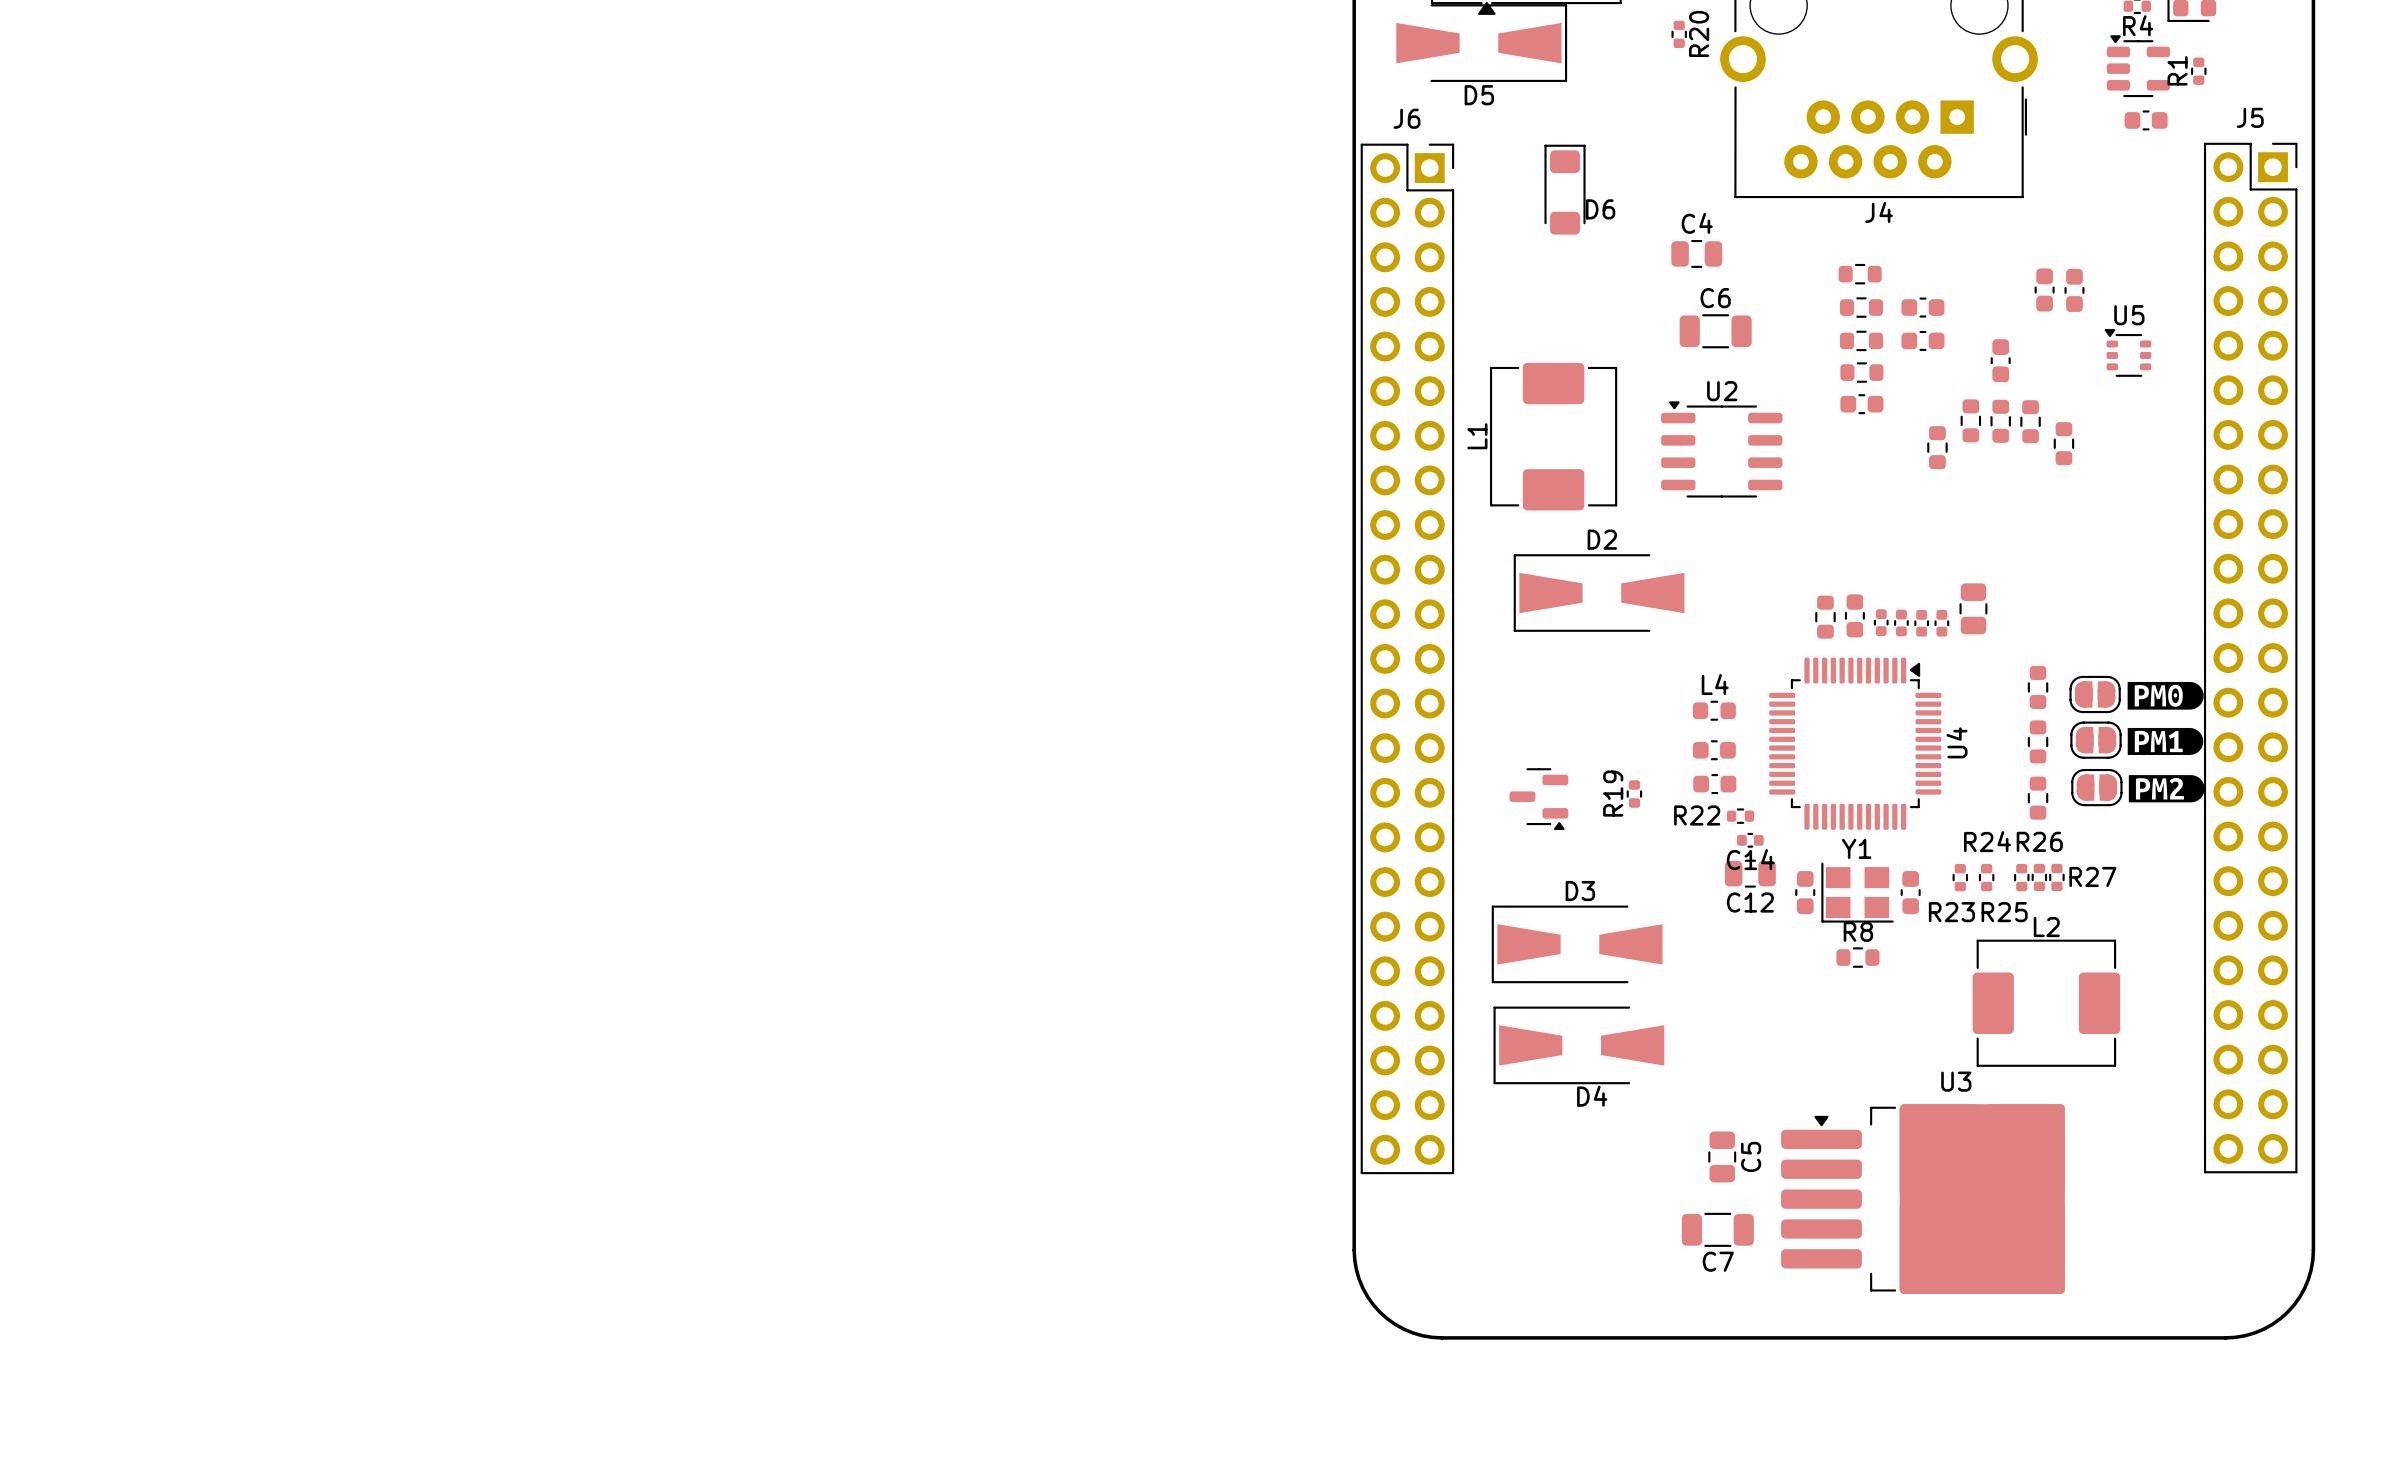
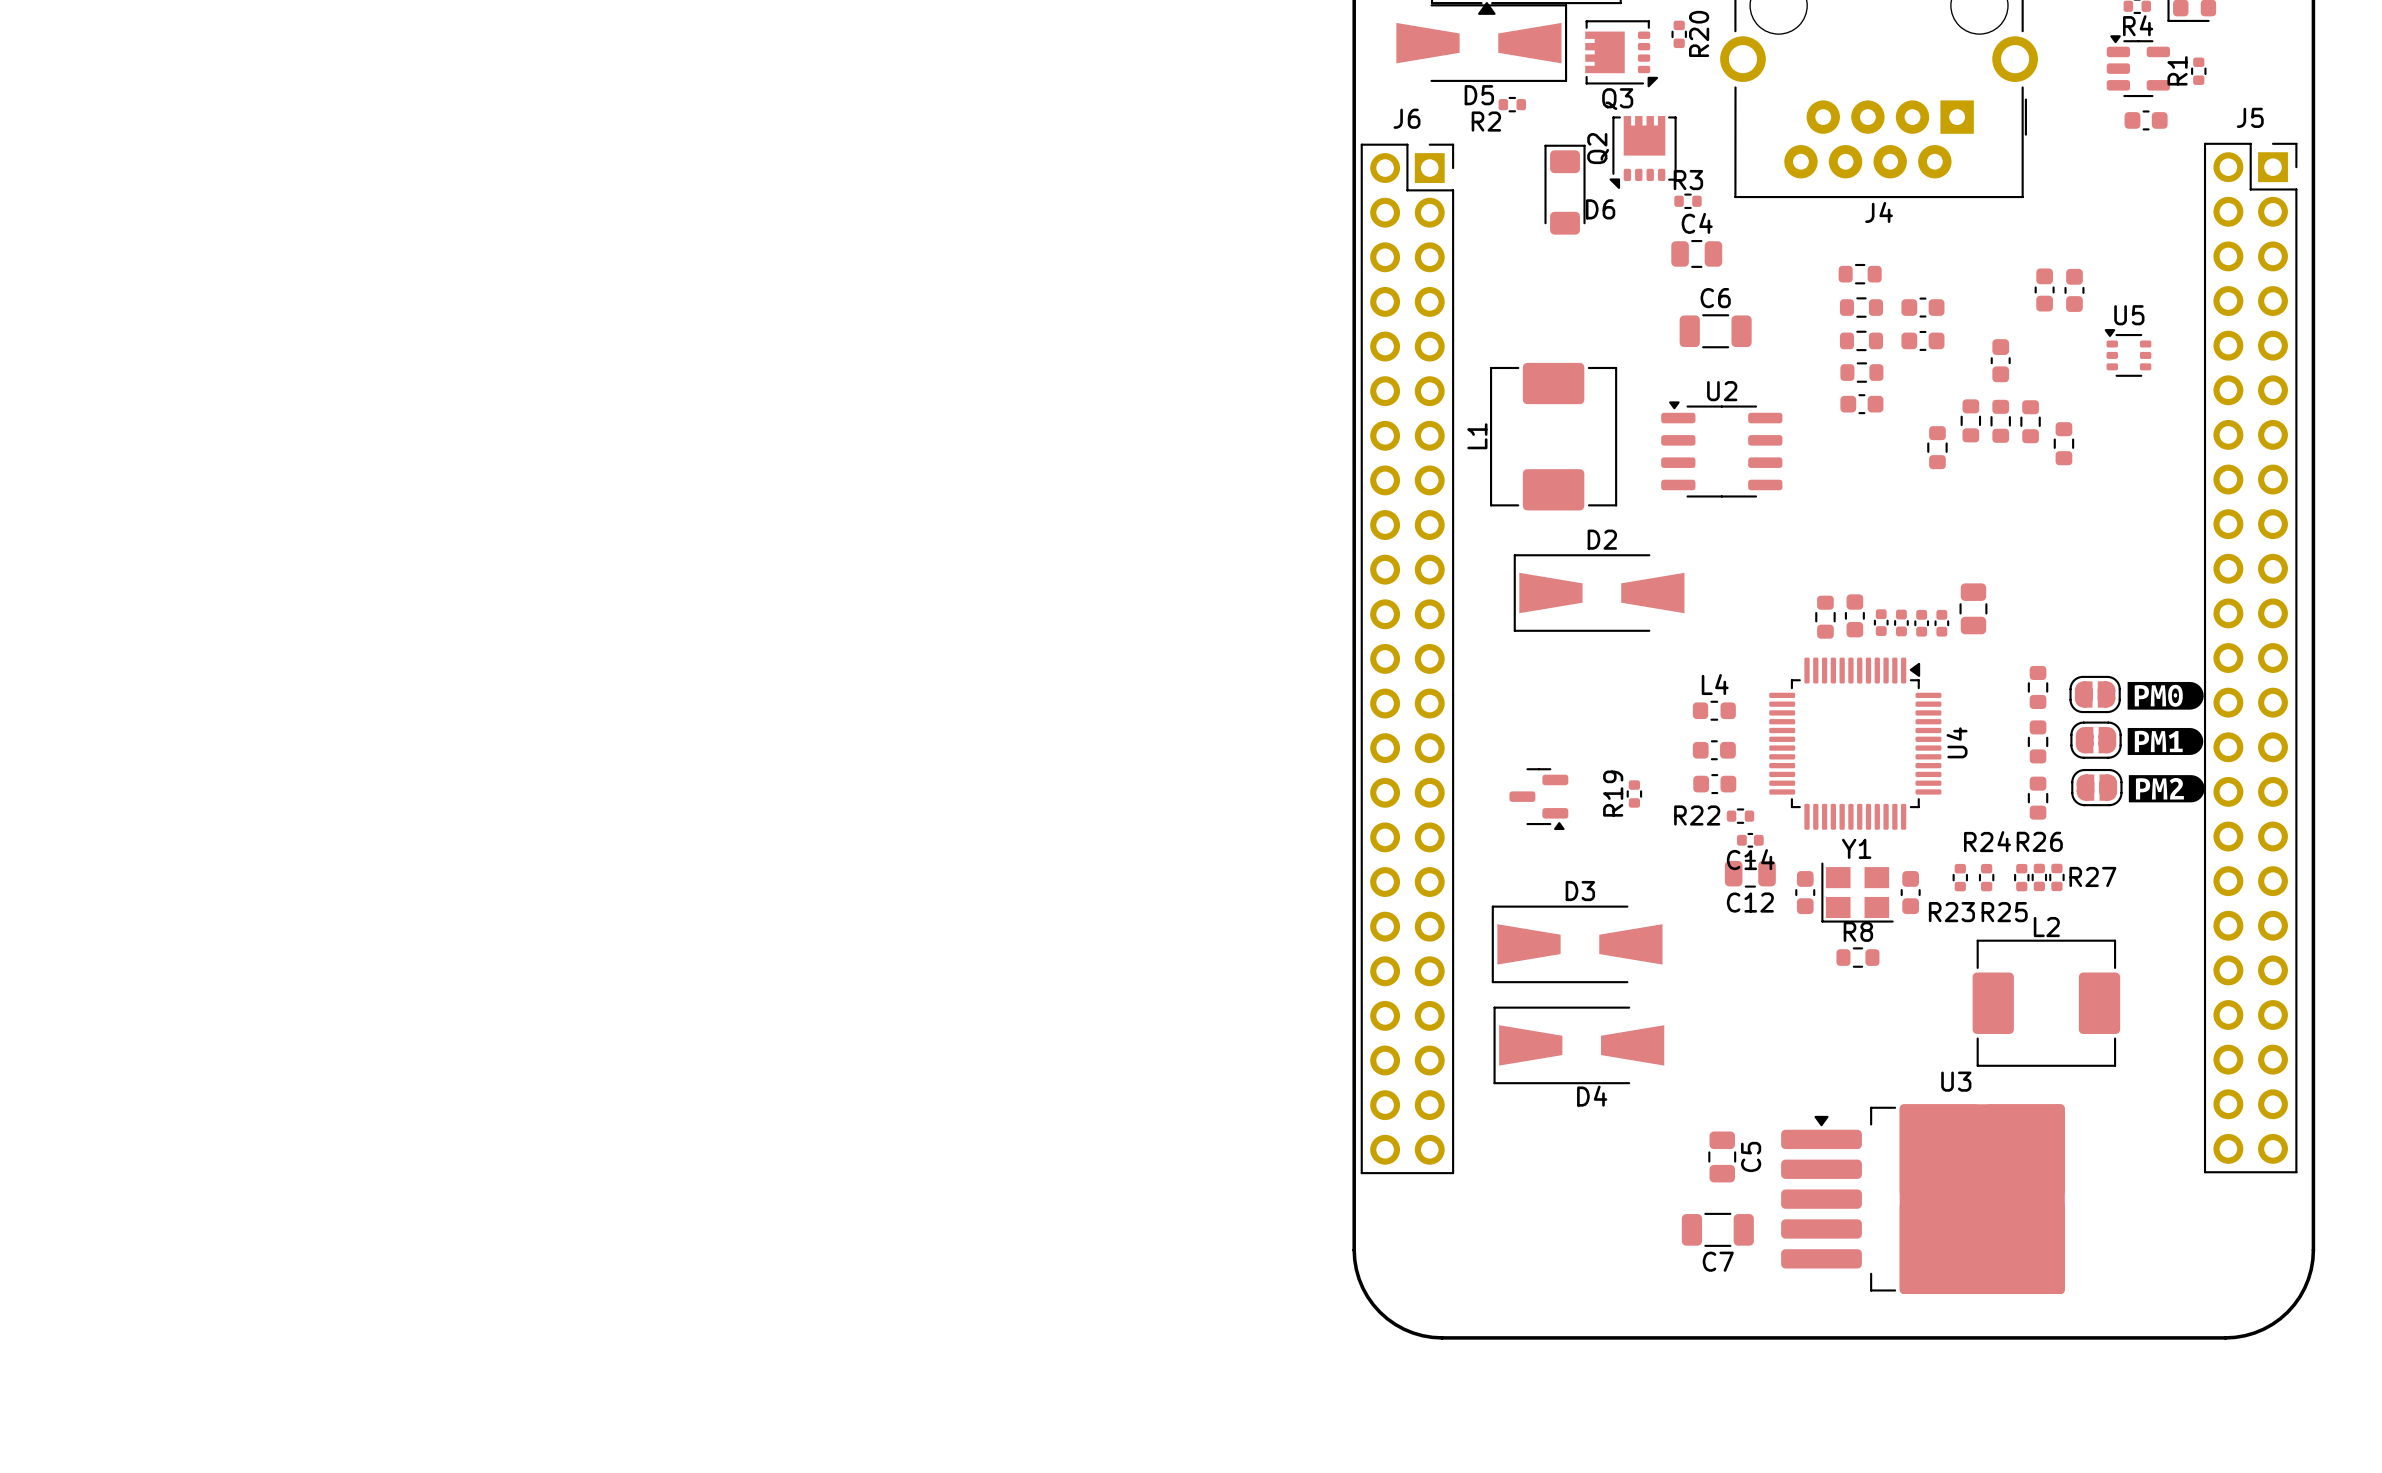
Q3: none -> (1621, 53)
R2: none -> (1512, 104)
Q2: none -> (1643, 152)
R3: none -> (1687, 201)

